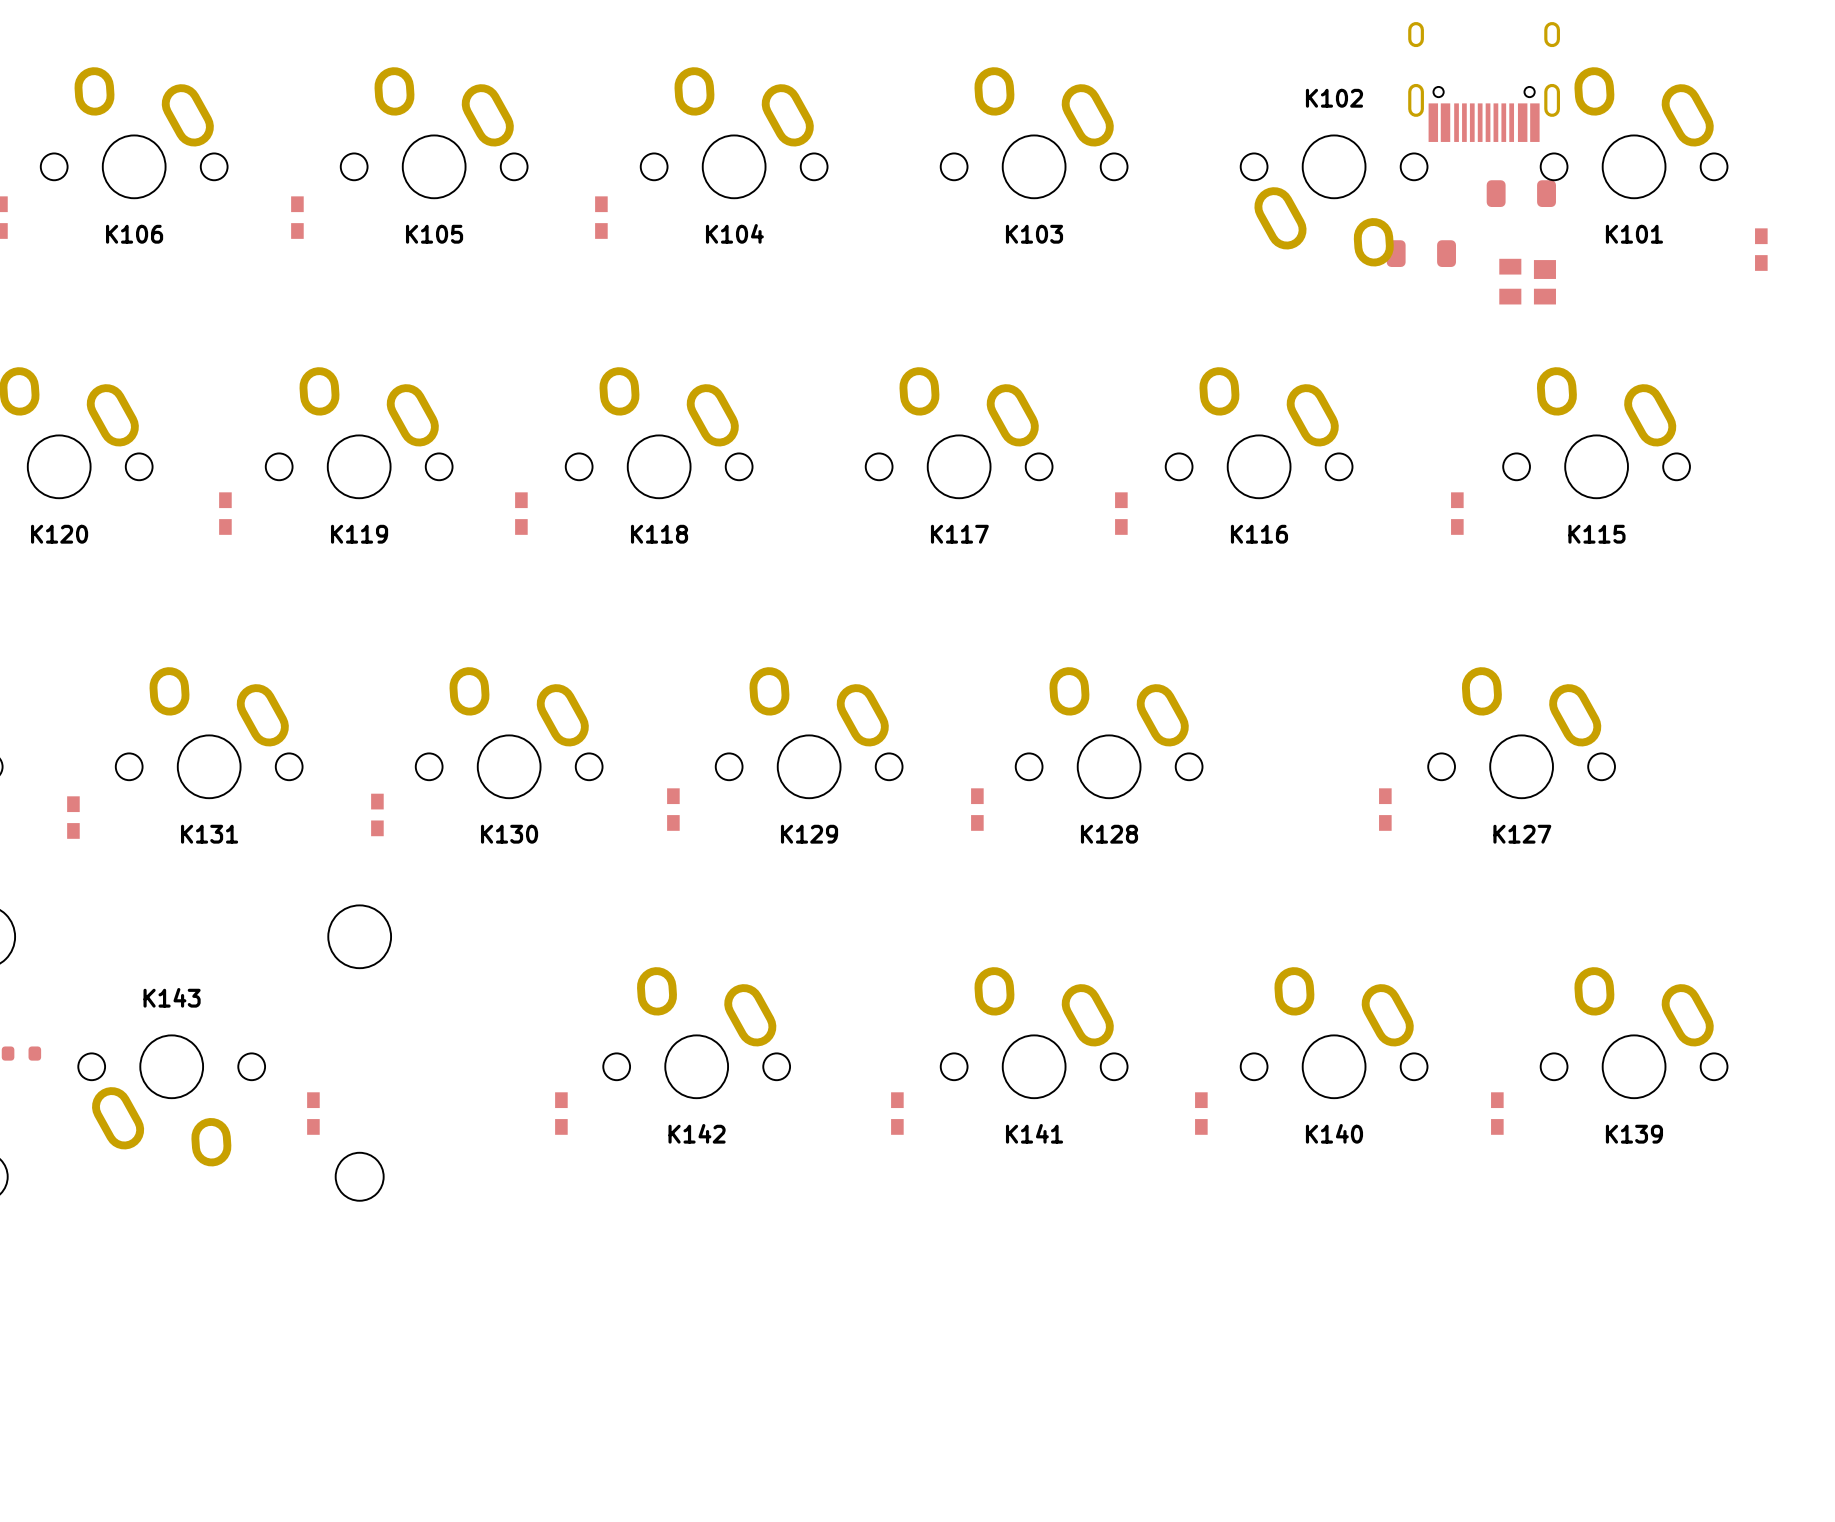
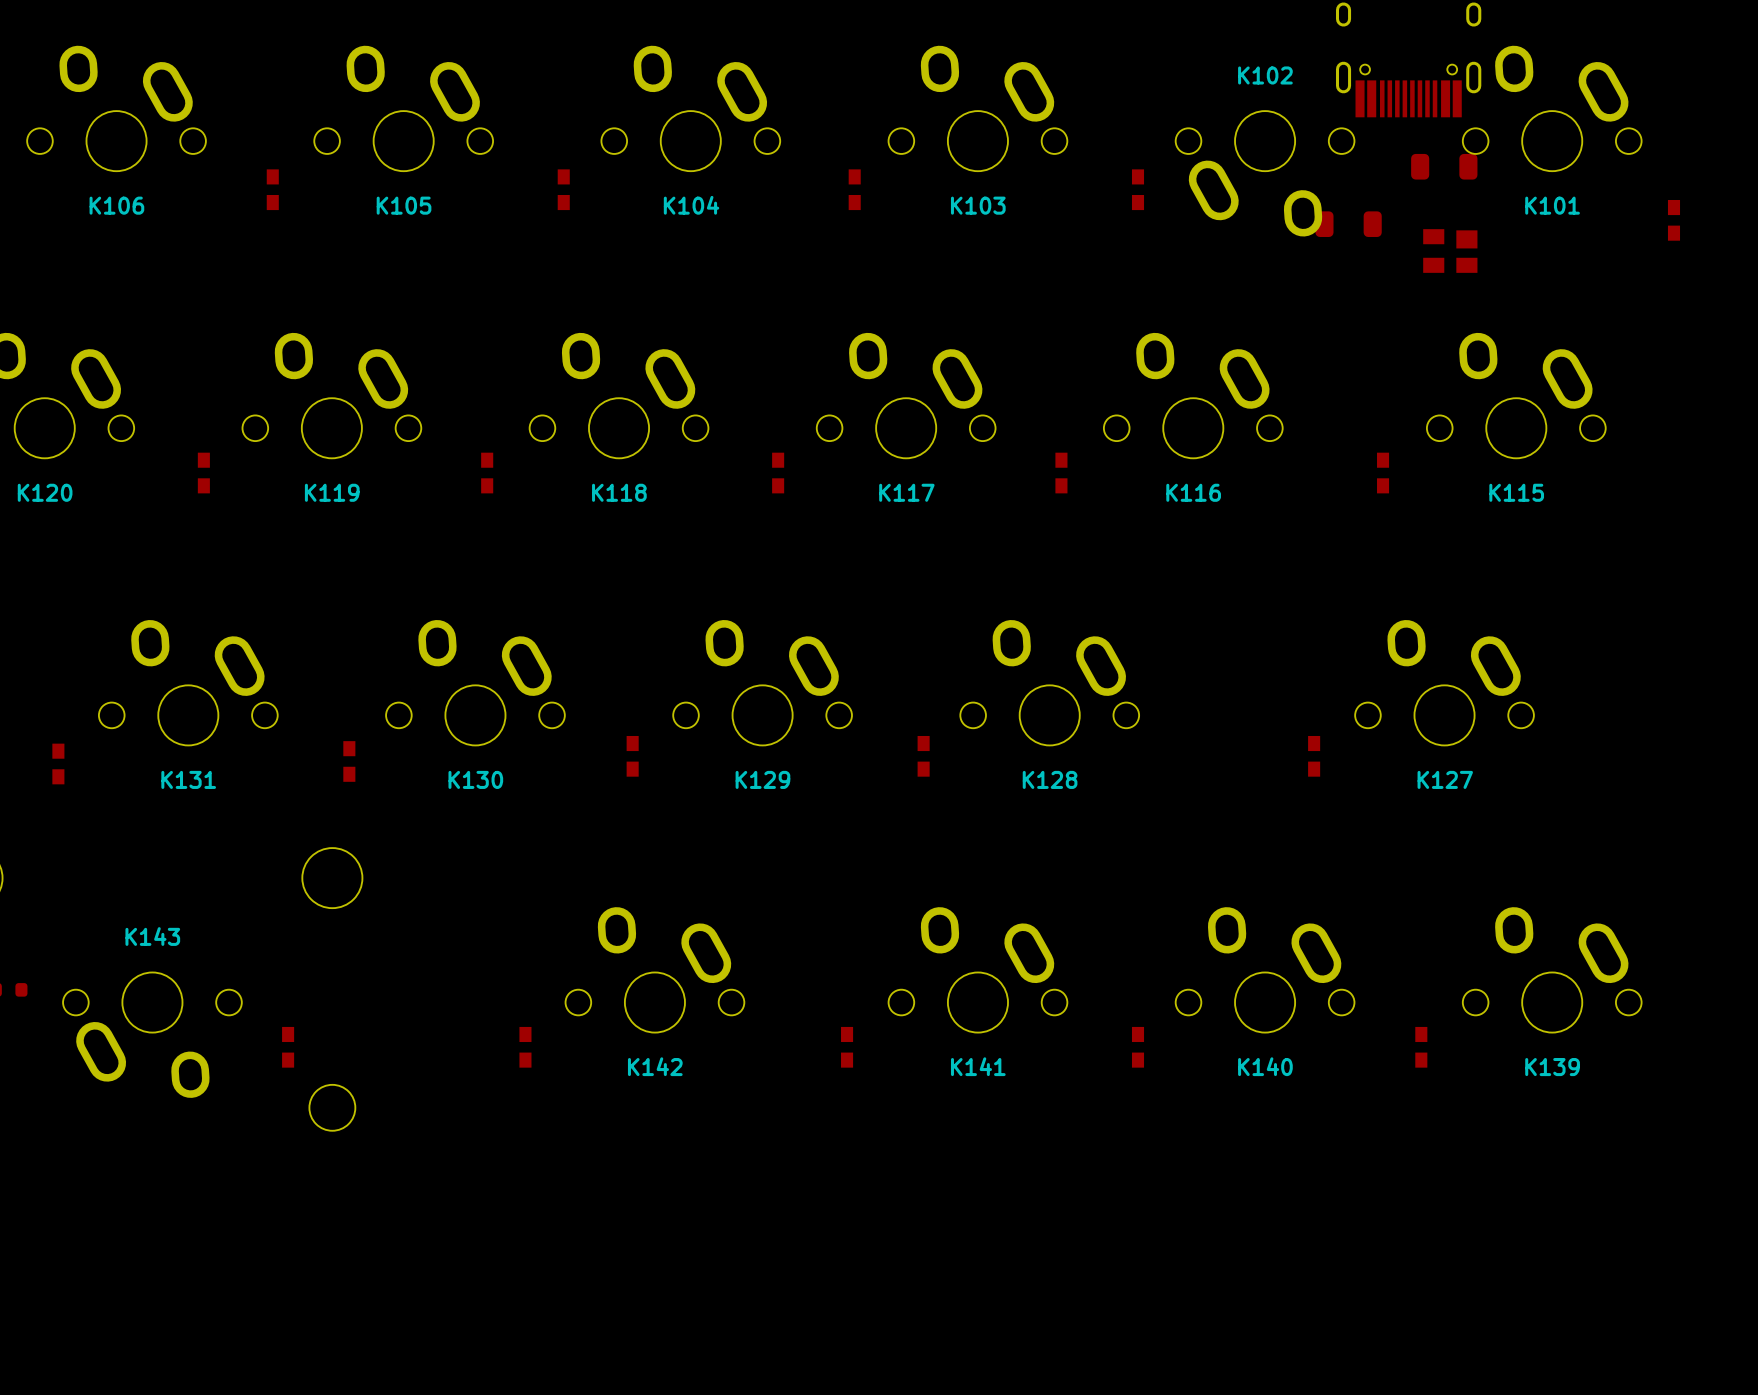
part: none -> (854, 189)
part: none -> (1138, 189)
part: none -> (778, 473)

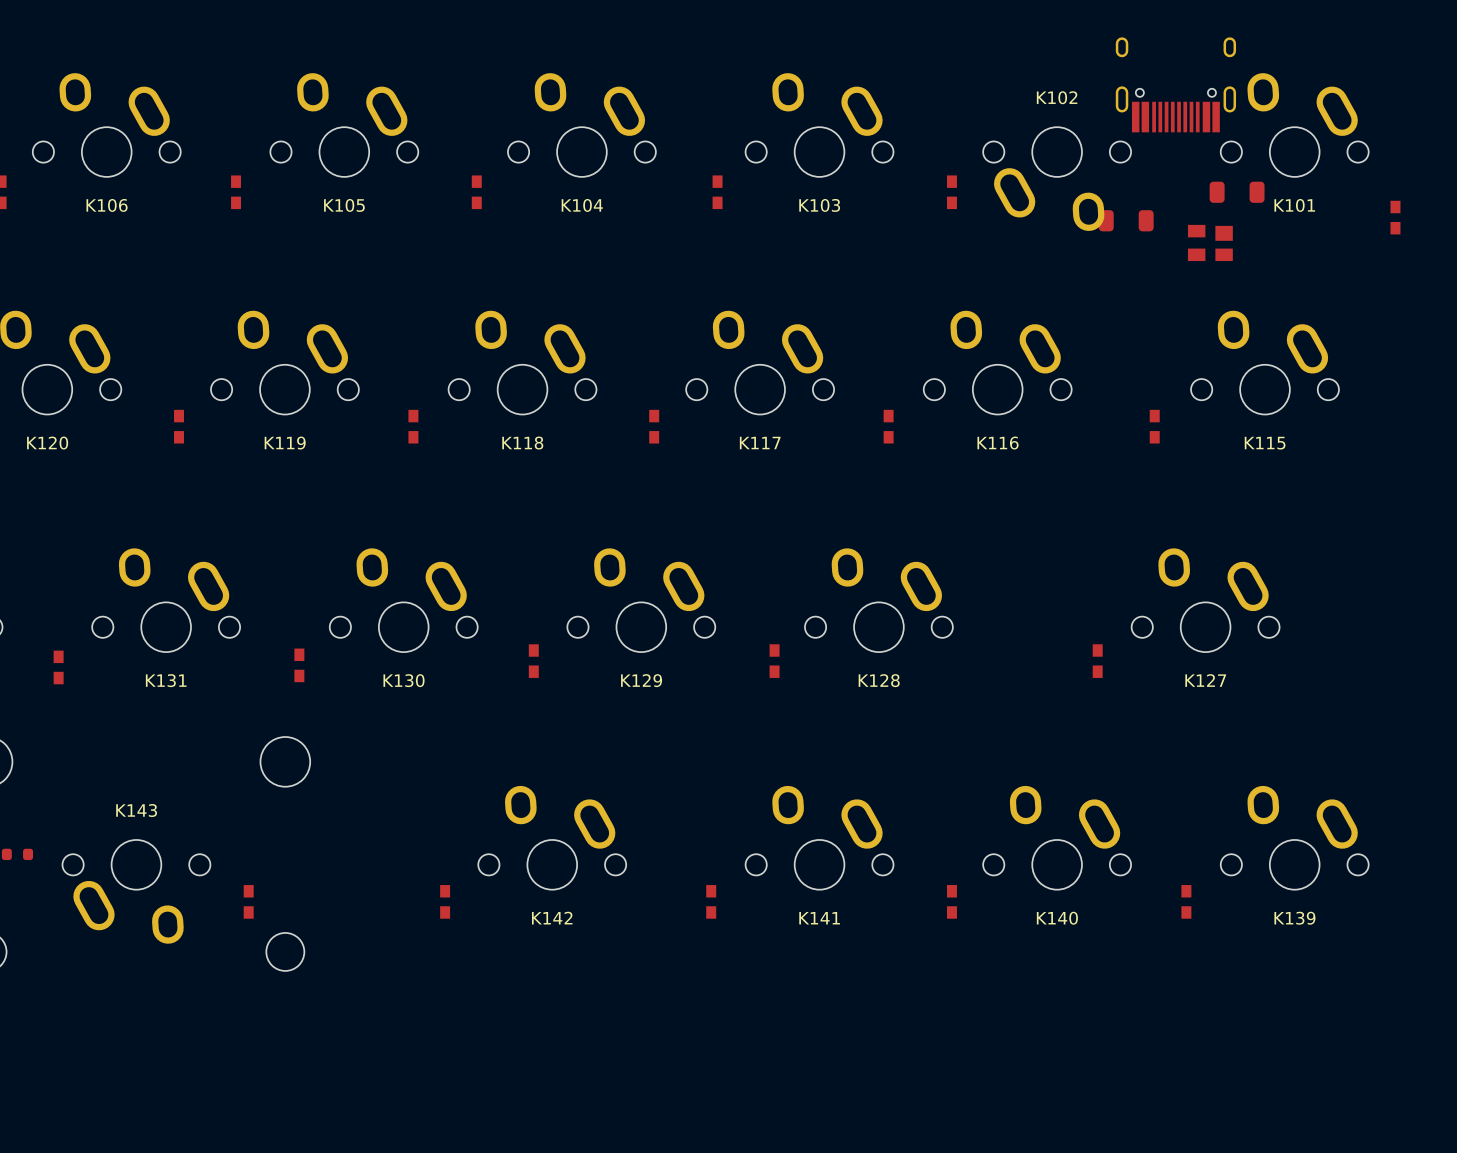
part position: (1444, 166) -> (1237, 192)

